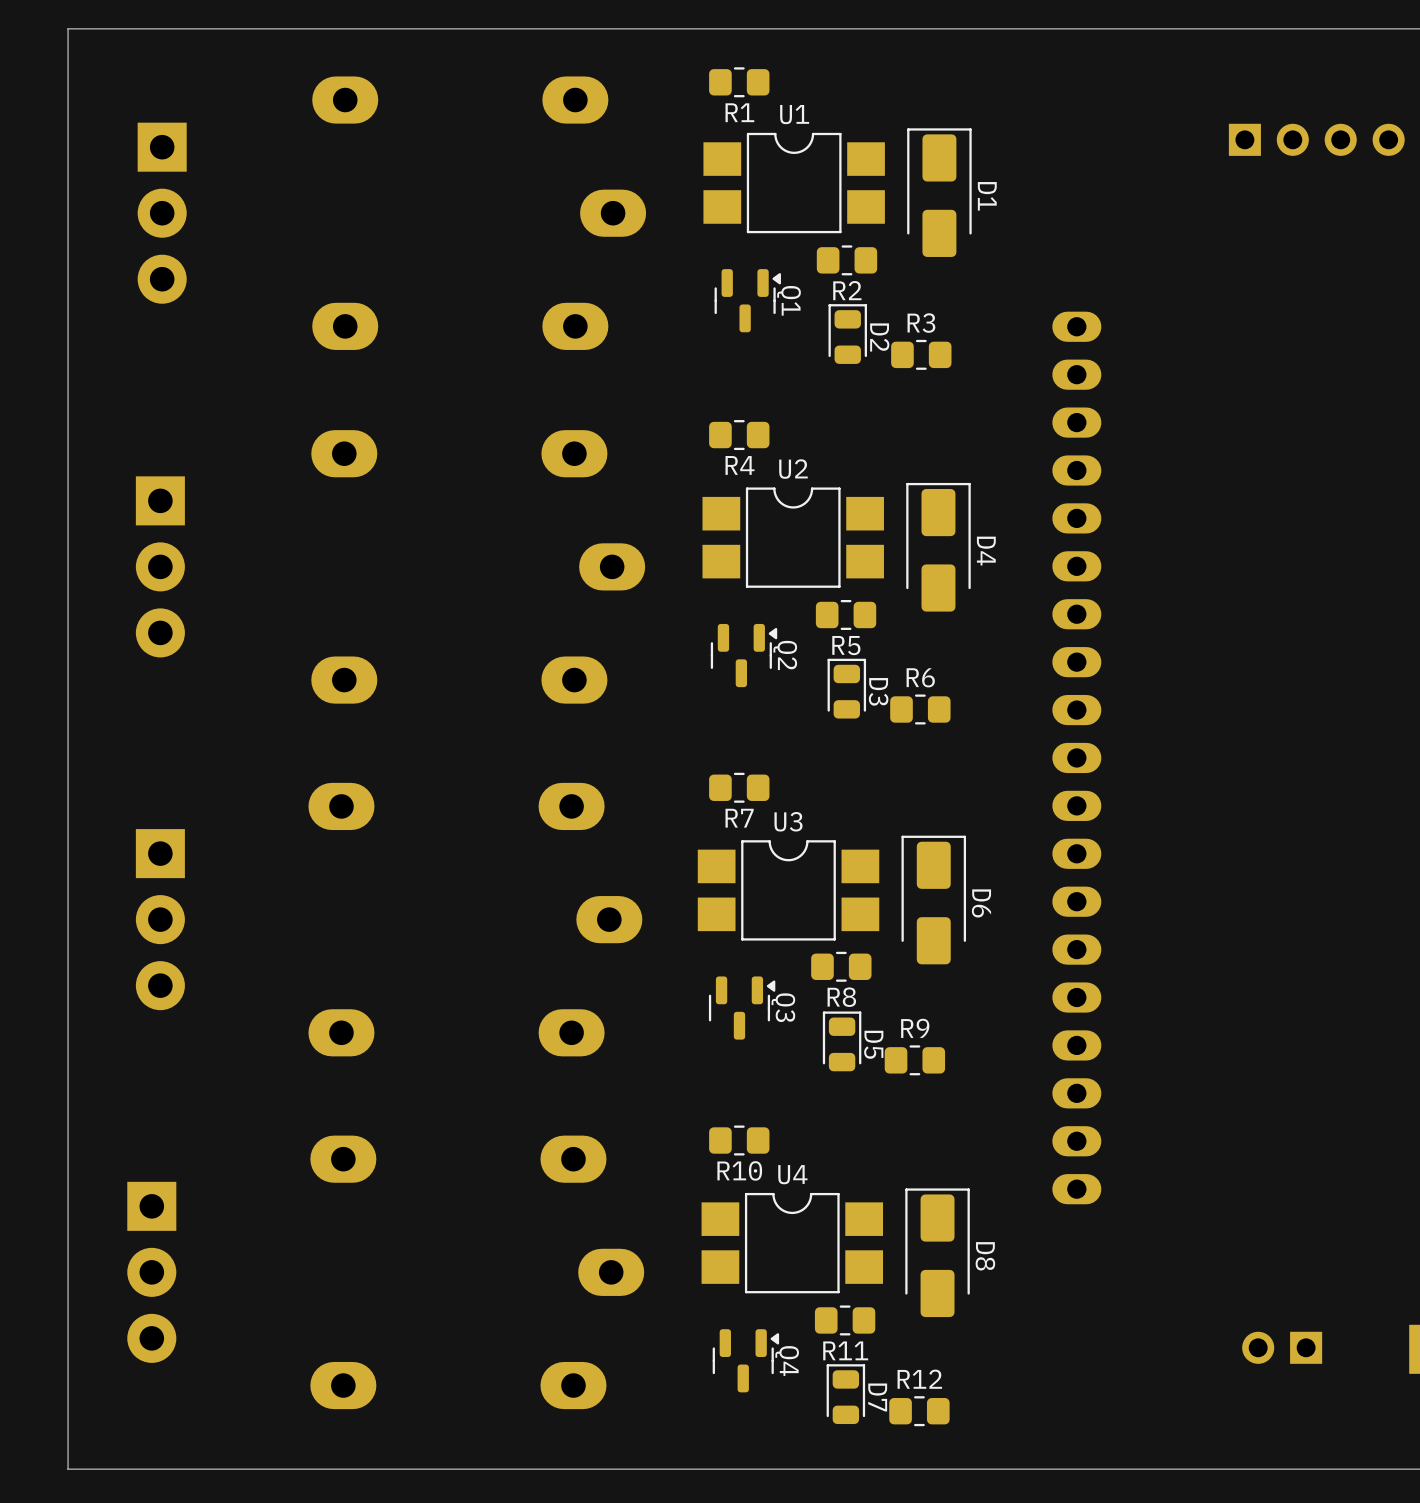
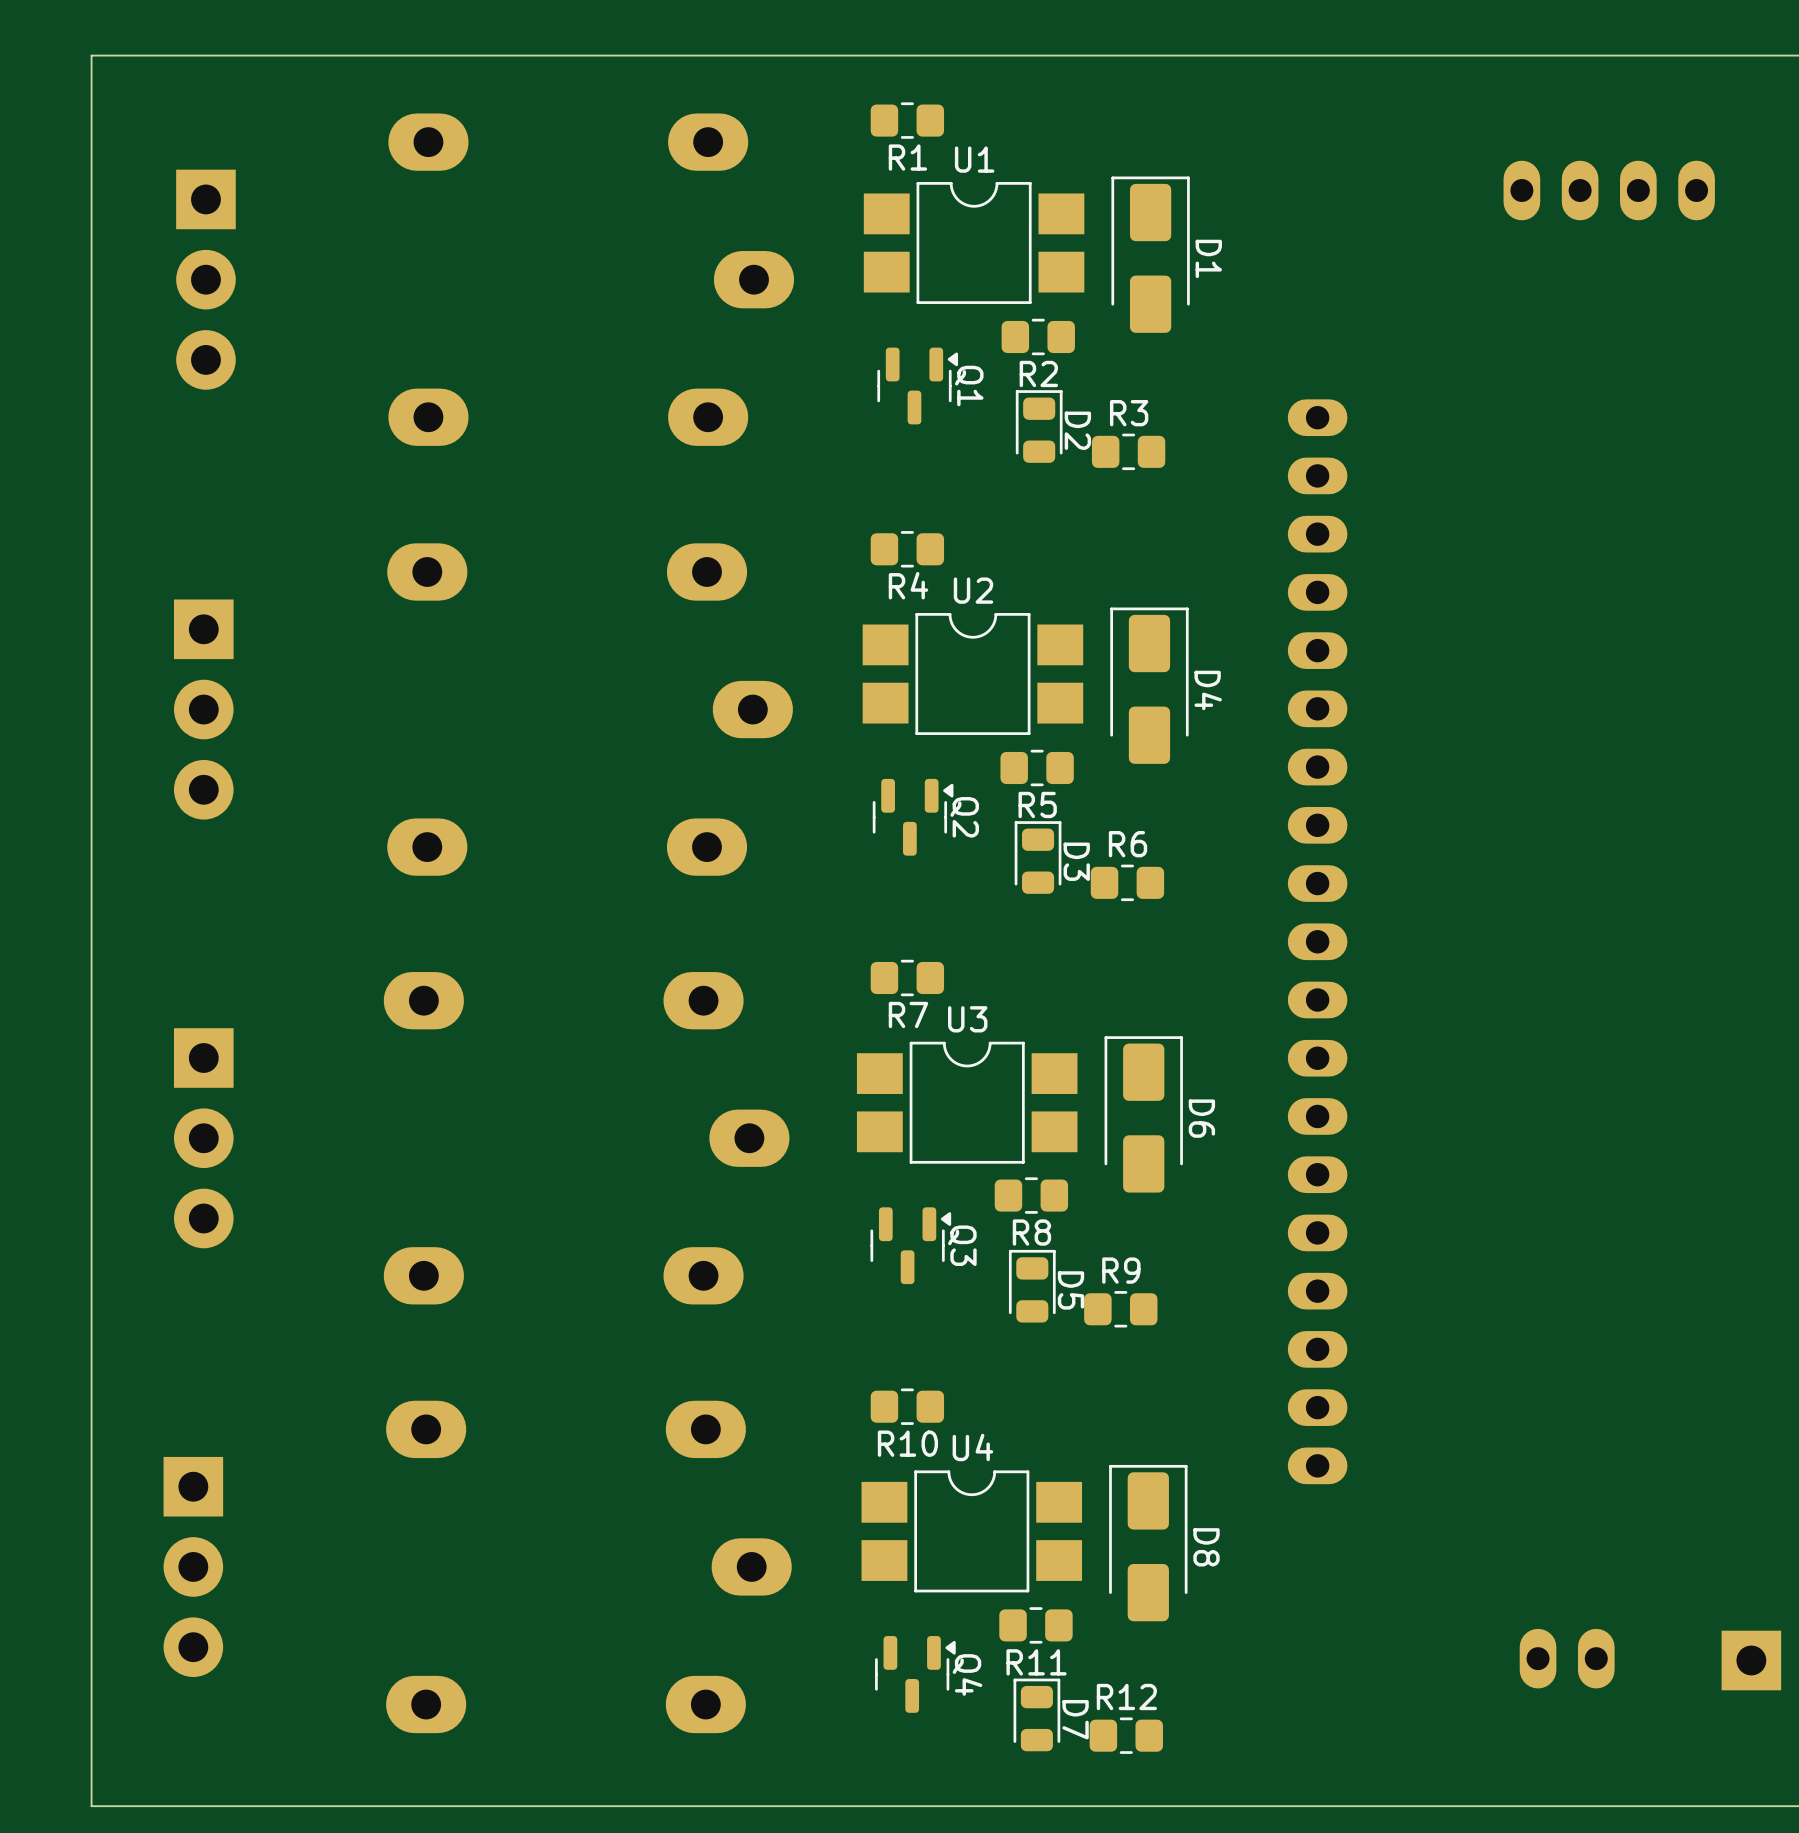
part footprint: [1228, 123, 1405, 156] -> [1503, 160, 1715, 221]
part footprint: [1242, 1331, 1323, 1364] -> [1519, 1628, 1615, 1689]

